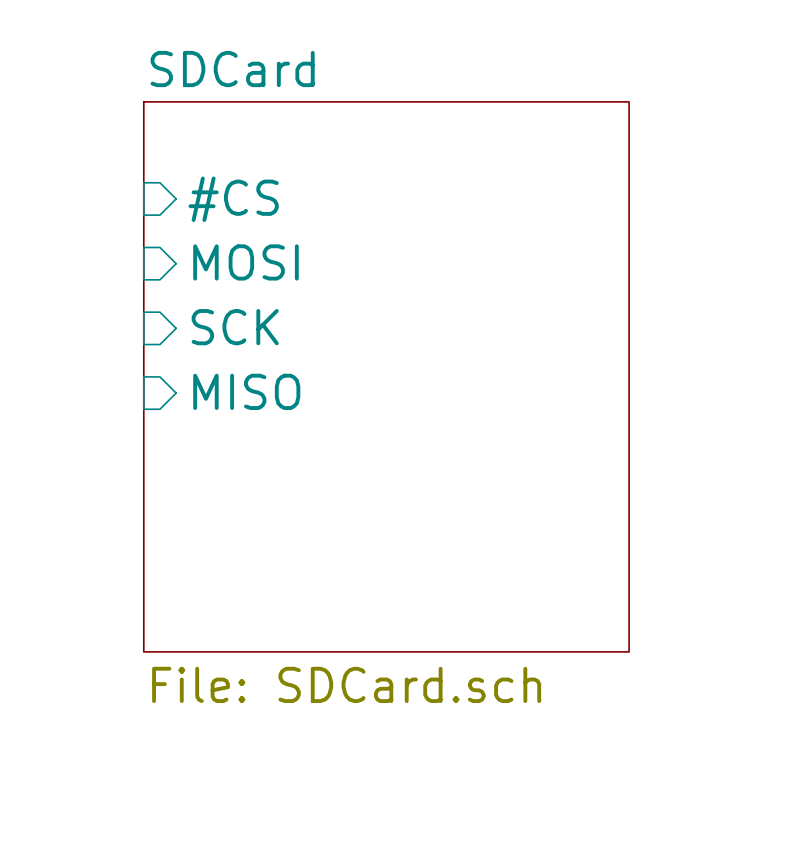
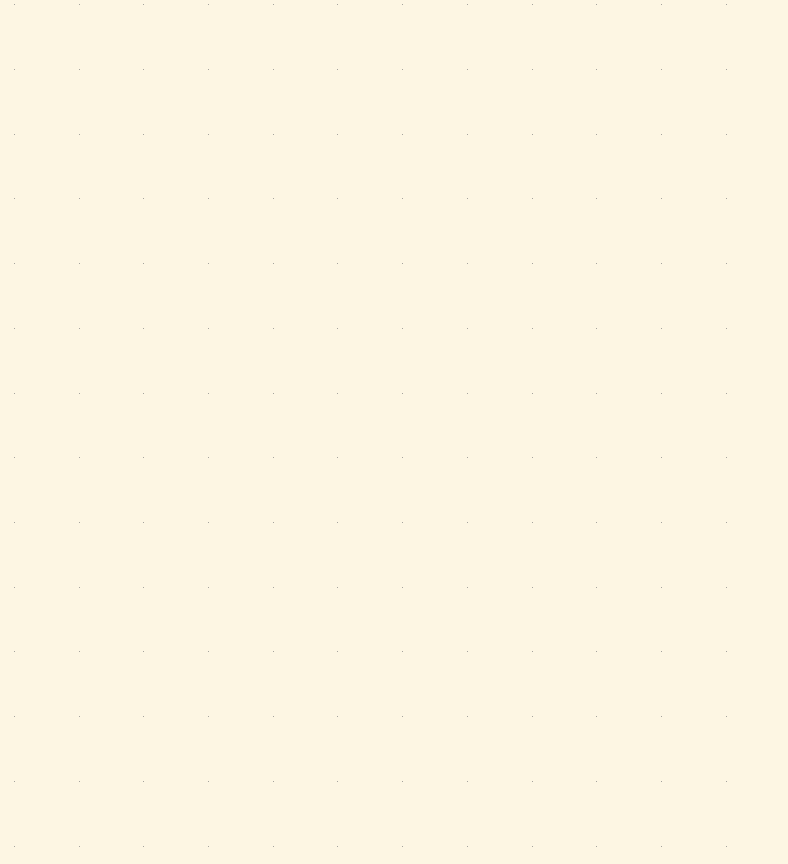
sheet pin: #CS (233, 199) -> none
sheet pin: MOSI (245, 262) -> none
sheet pin: SCK (235, 327) -> none
sheet SDCard: File: SDCard.sch (386, 376) -> none
sheet pin: MISO (246, 391) -> none

